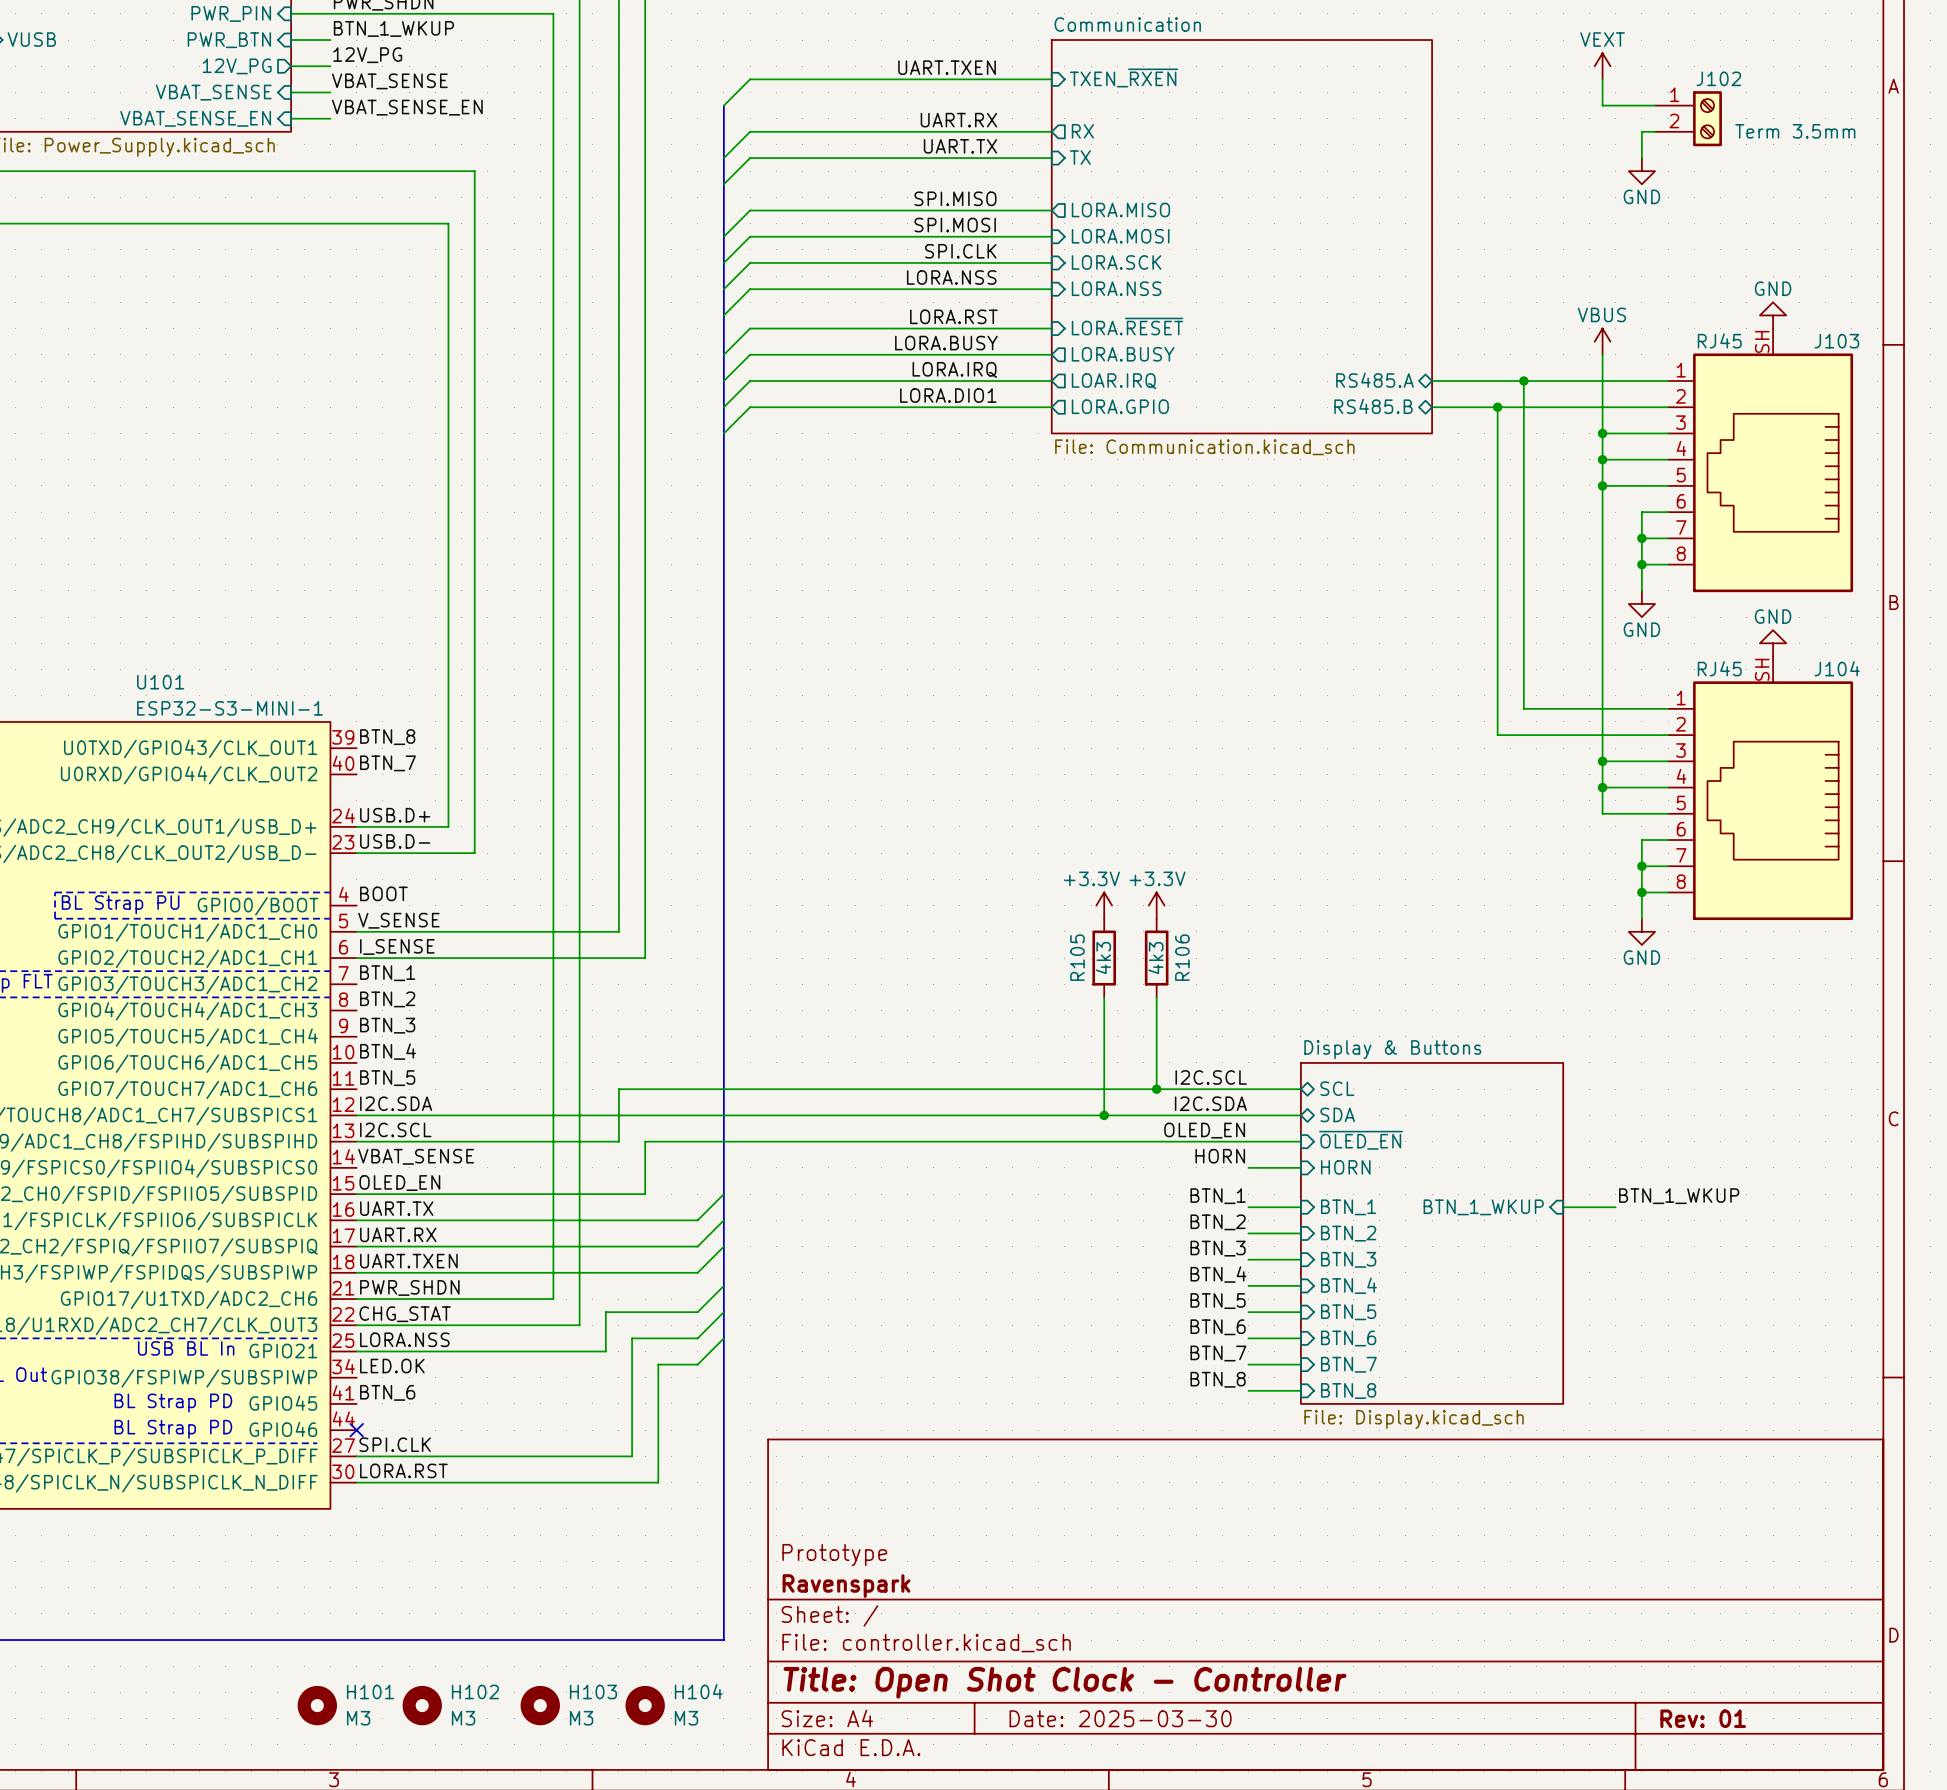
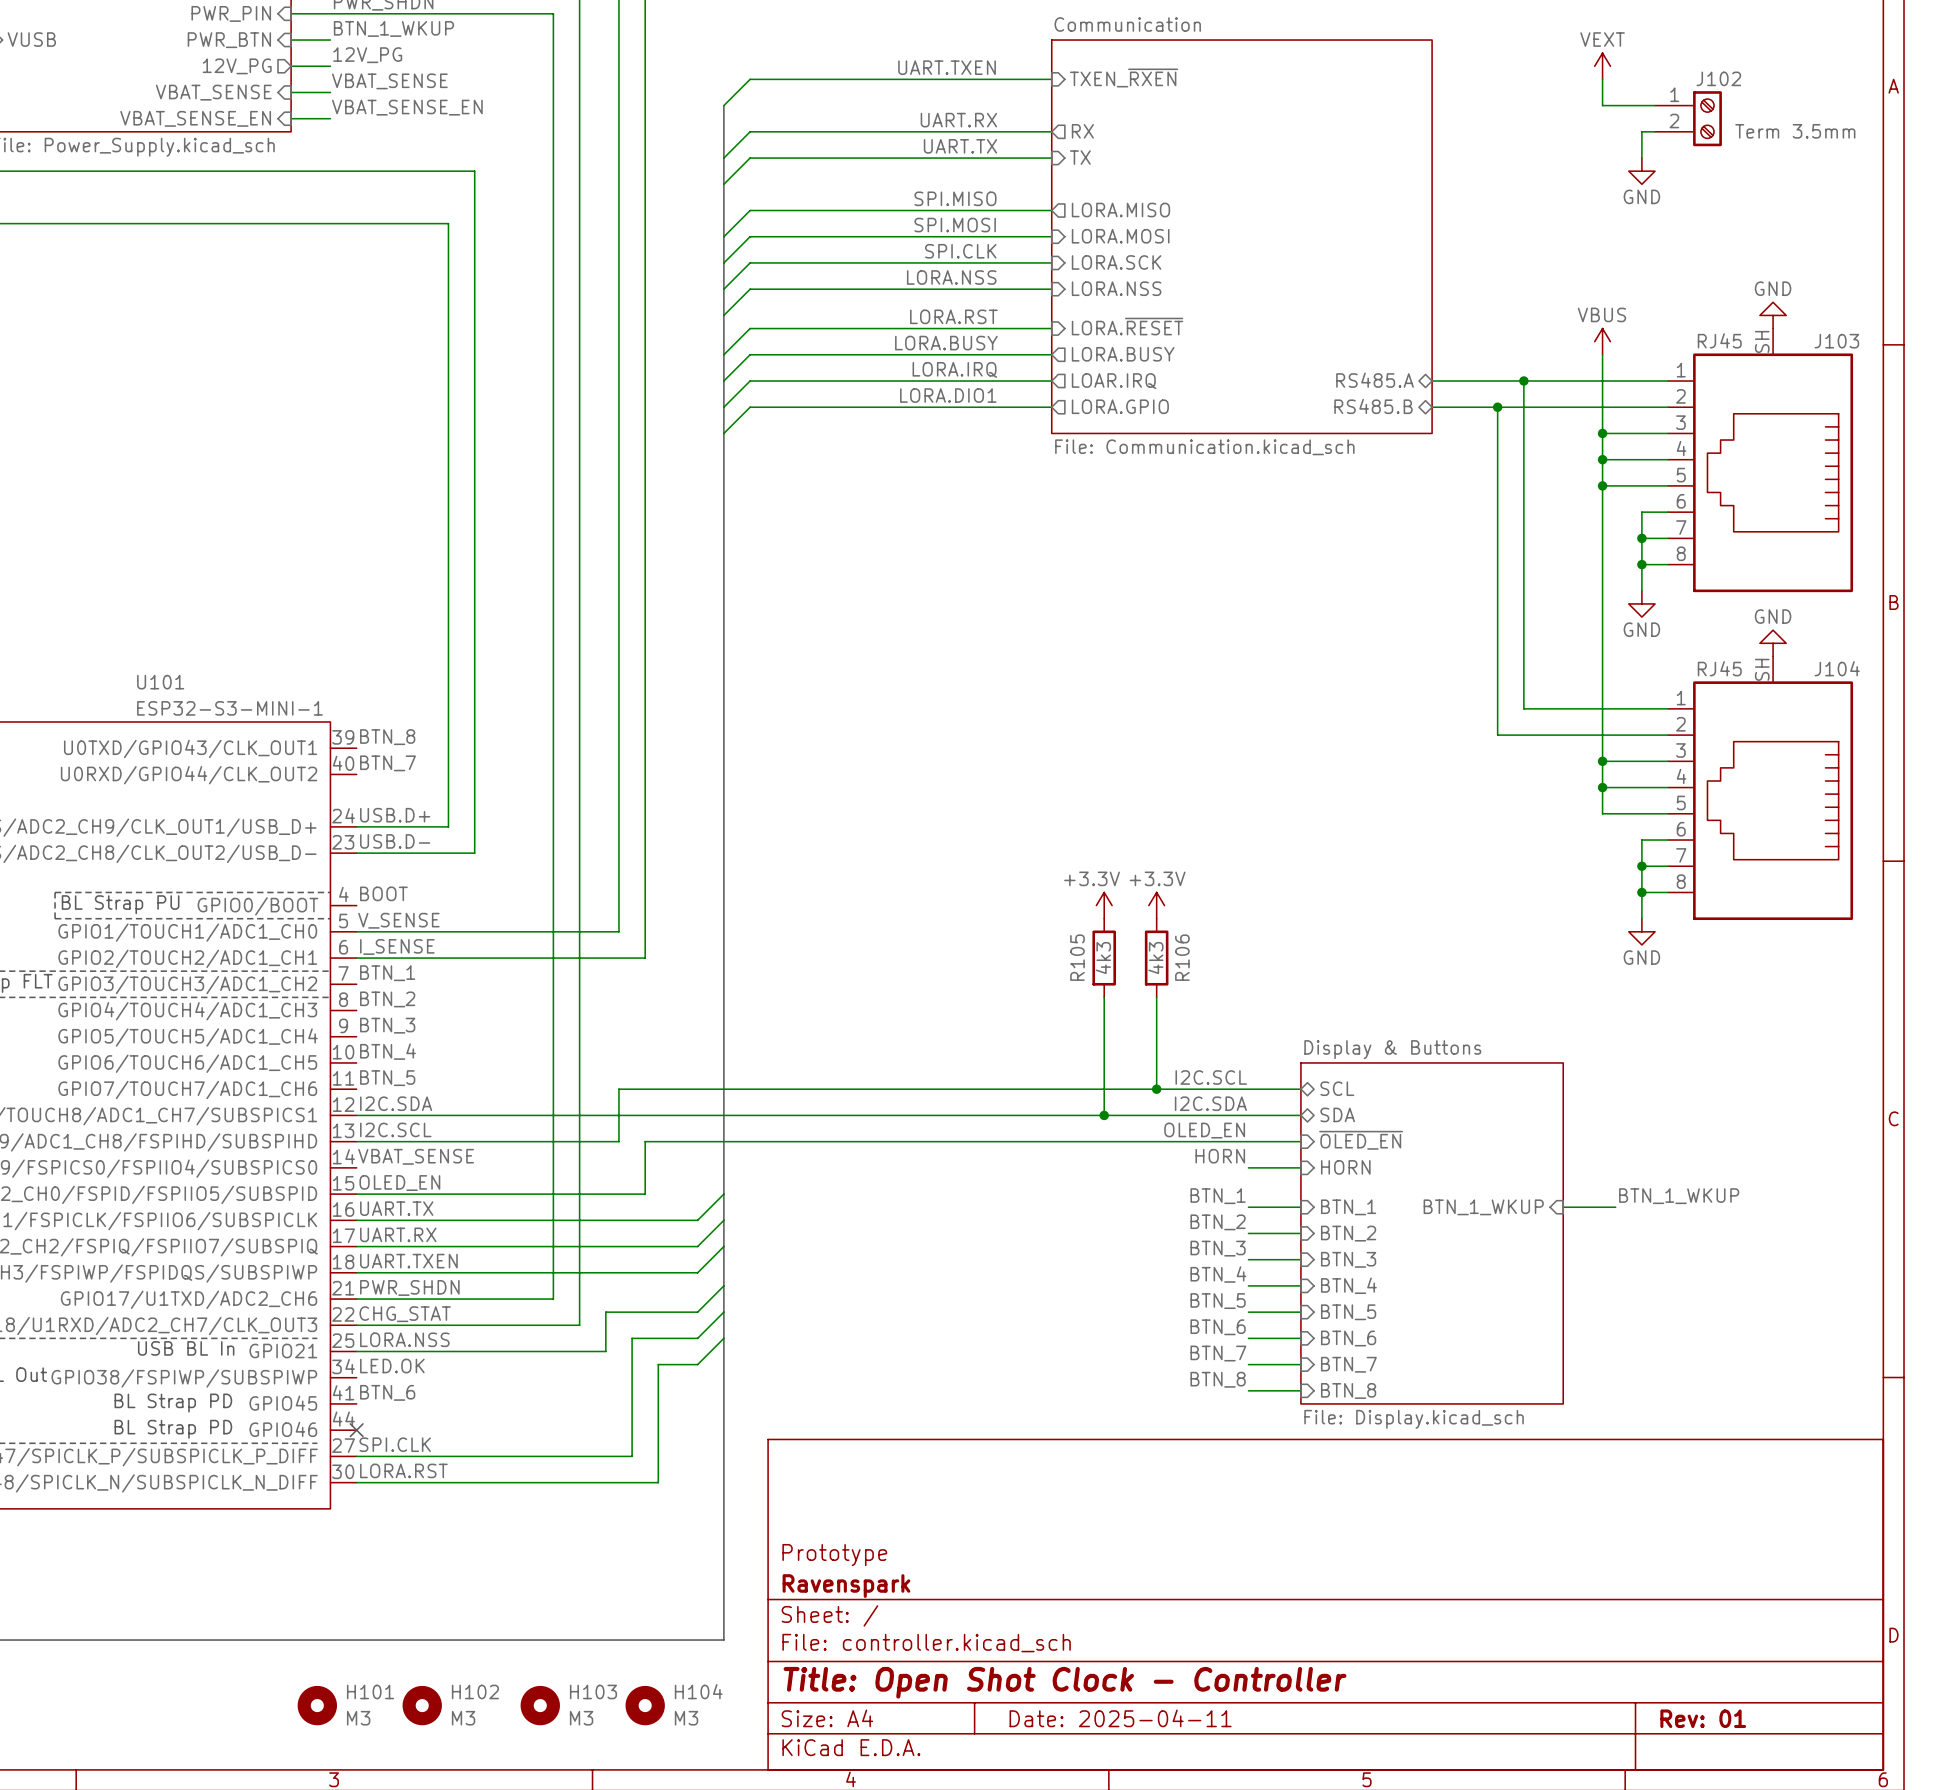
title block: Date: 2025-03-30 (1120, 1718) -> Date: 2025-04-11 (1120, 1718)

